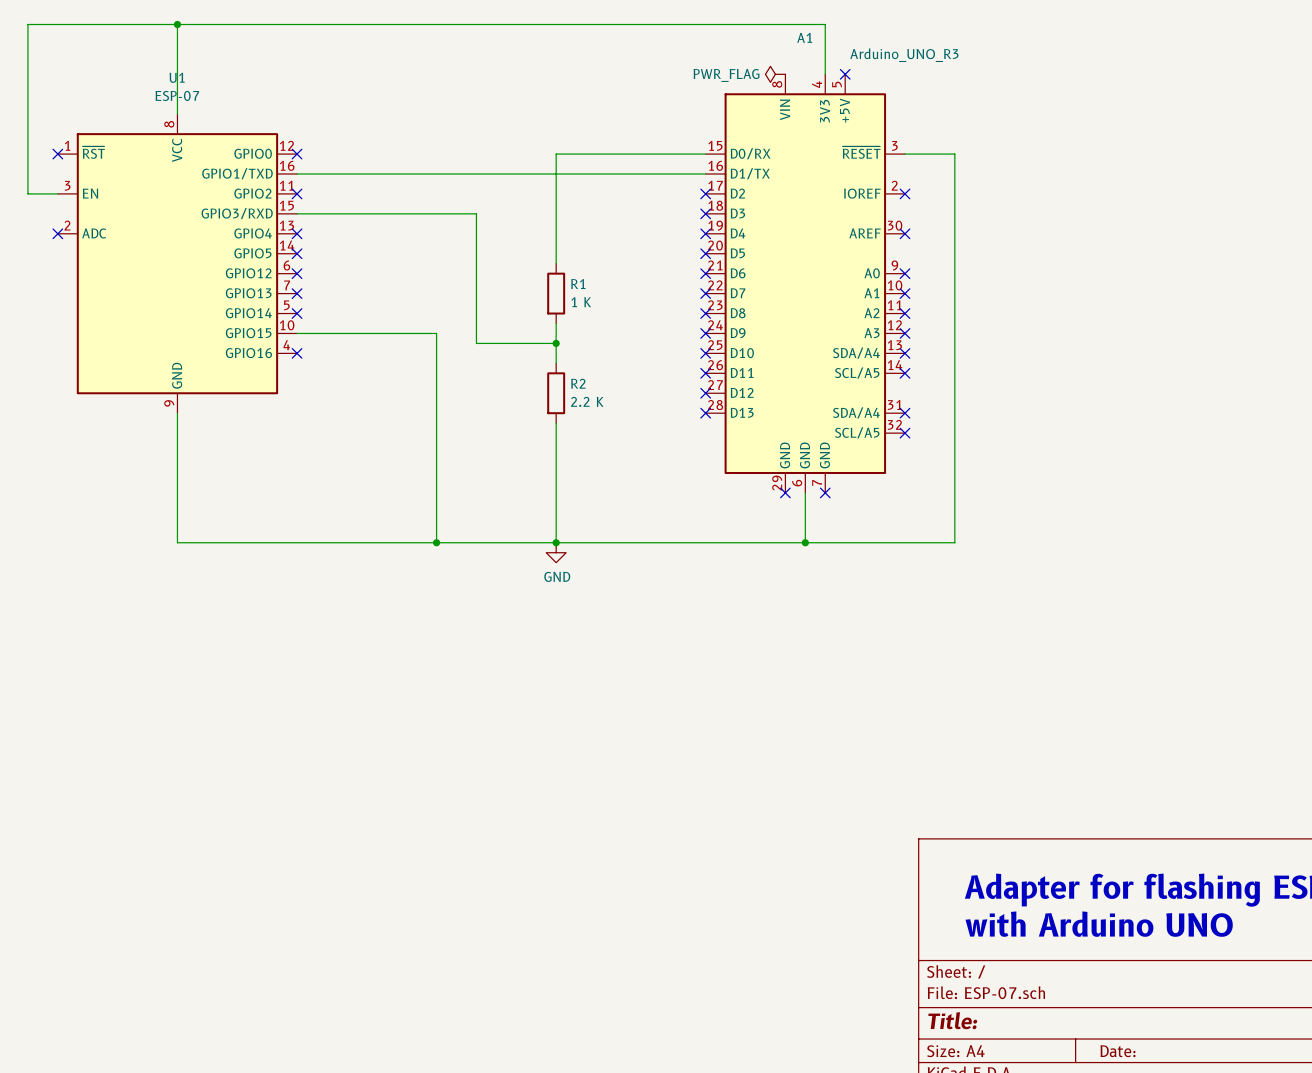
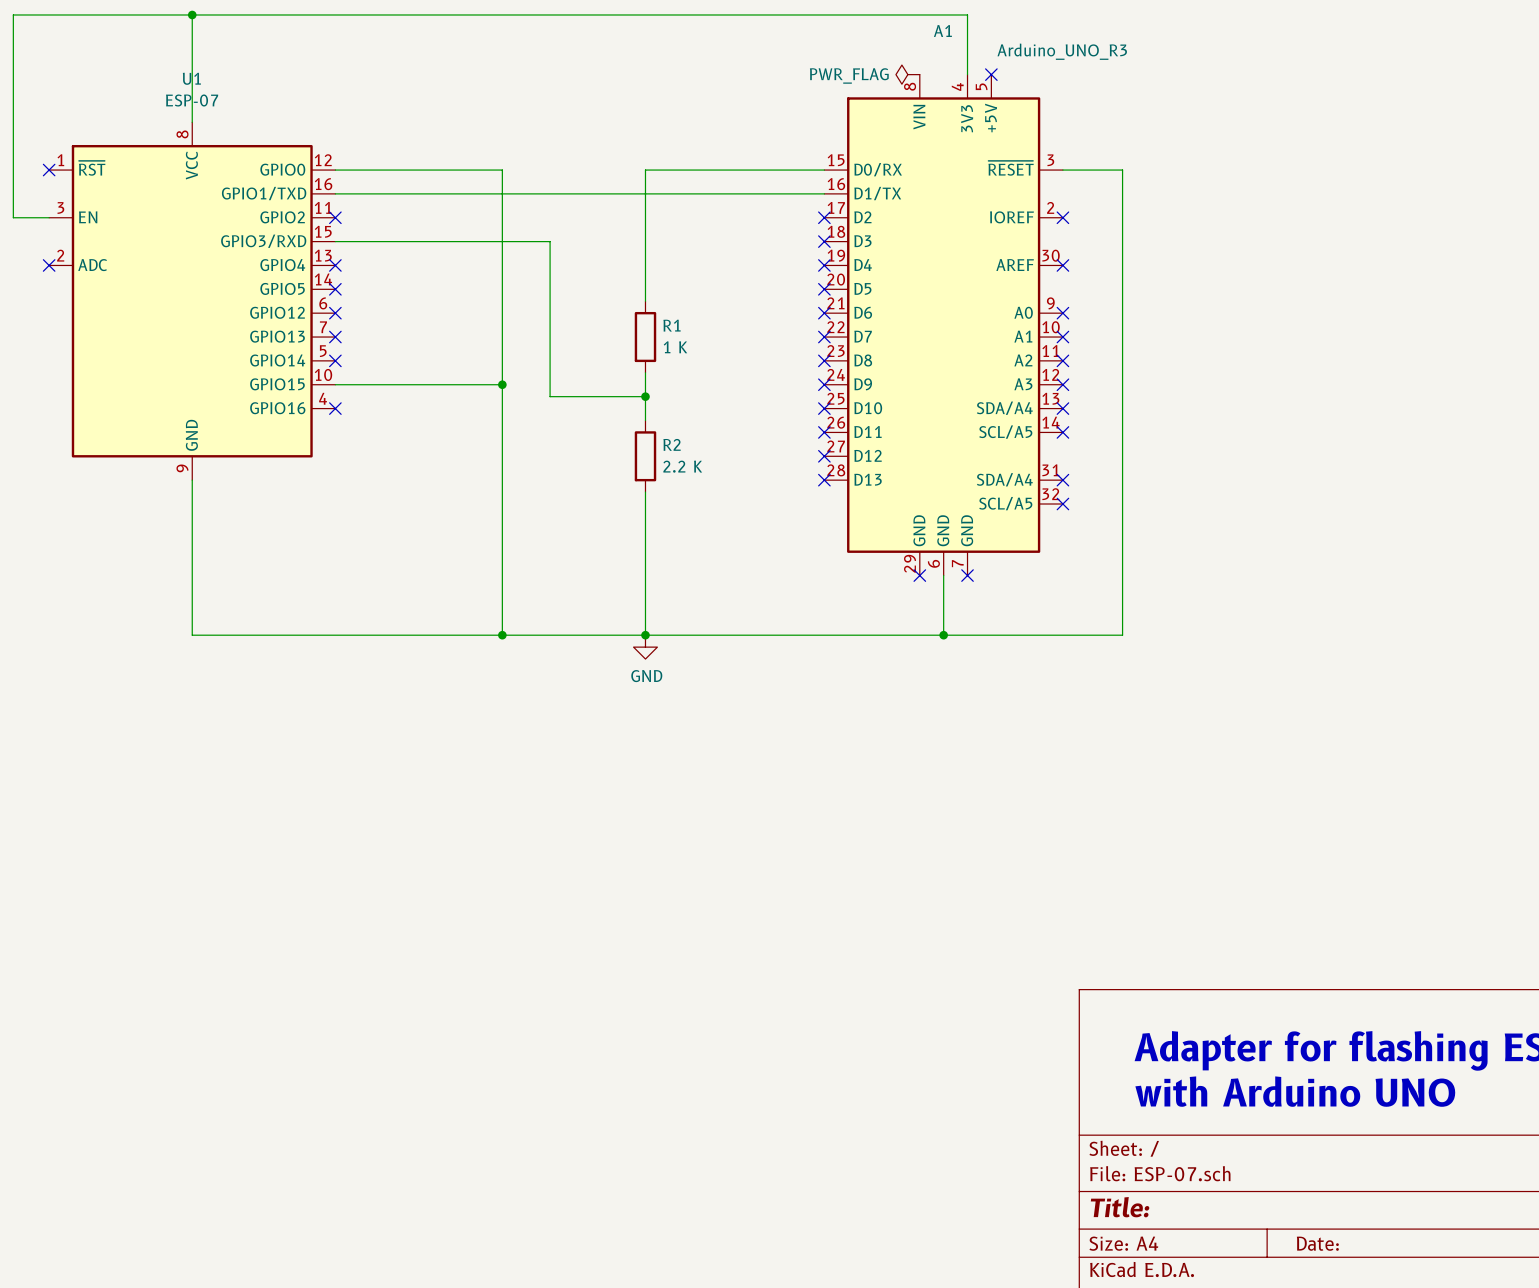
wire: none -> (335, 170) (502, 170) (502, 384)
no-connect mark: (297, 154) -> none
junction: none -> (502, 384)

